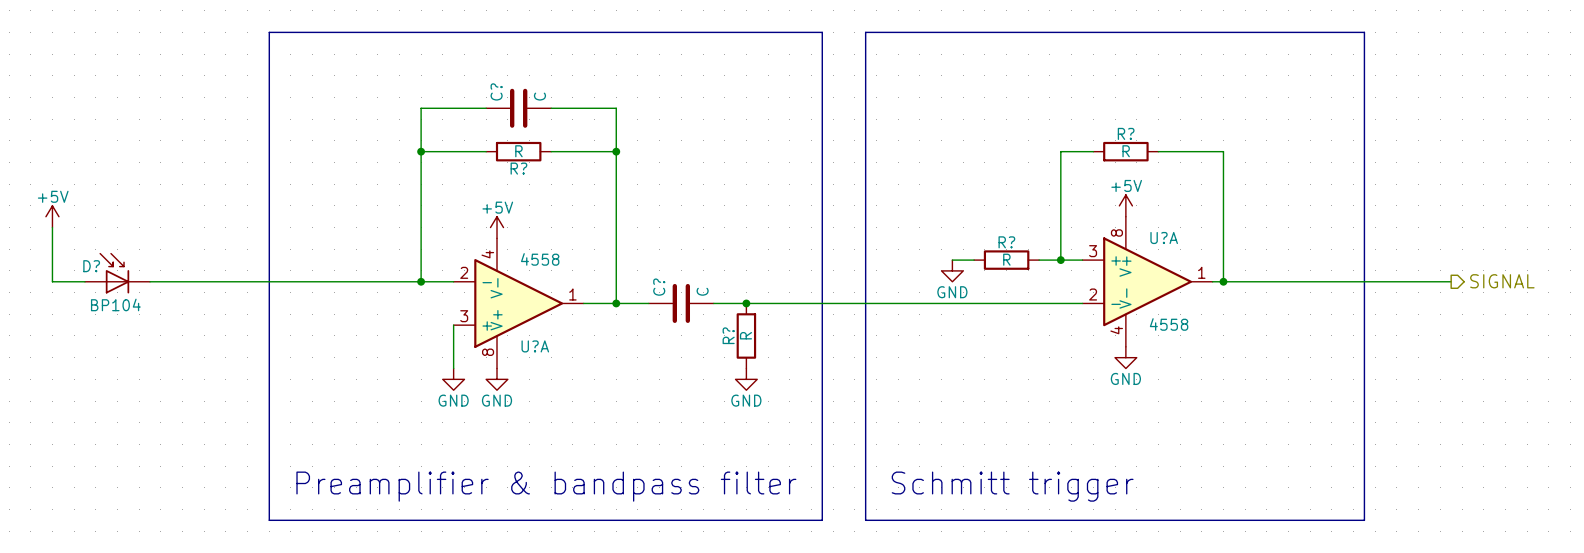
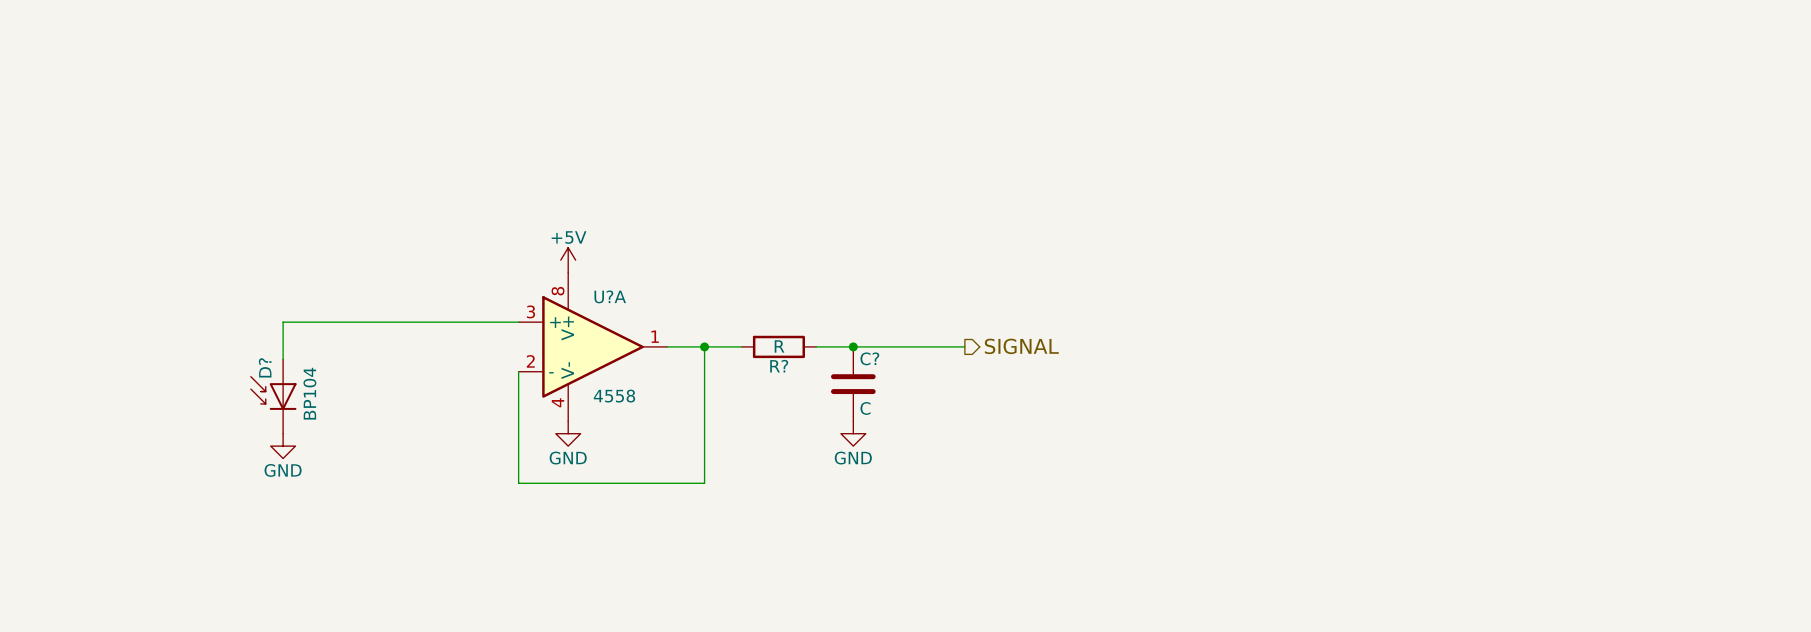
bus: (269, 32) (822, 32) (822, 520) (269, 520) (269, 32) -> none
bus: (865, 32) (865, 520) (1364, 520) (1364, 32) (865, 32) -> none
wire: (486, 108) (421, 108) (421, 281) -> none
C?: C (518, 108) -> none
wire: (551, 108) (616, 108) (616, 303) -> (518, 421) (518, 483) (704, 483) (704, 346)
wire: (421, 151) (486, 151) -> none
junction: (421, 151) -> none
R?: R (518, 151) -> none
wire: (551, 151) (616, 151) -> none
junction: (616, 151) -> none
wire: (1093, 151) (1060, 151) (1060, 260) -> none
R?: R (1125, 151) -> none
wire: (1158, 151) (1223, 151) (1223, 281) -> none
power symbol: +5V (1125, 205) -> none
power symbol: +5V (52, 216) -> none
wire: (52, 227) (52, 281) (84, 281) -> none
wire: (952, 260) (974, 260) -> none
R?: R (1006, 260) -> none
wire: (1039, 260) (1082, 260) -> none
junction: (1060, 260) -> none
power symbol: GND (952, 270) -> none
D?: BP104 (117, 273) -> none
wire: (150, 281) (247, 281) -> (283, 359) (283, 322)
junction: (421, 281) -> none
U?A: 4558 (1147, 281) -> none
wire: (1212, 281) (1451, 281) -> none
junction: (1223, 281) -> none
hierarchical label: SIGNAL (1502, 281) -> none
hierarchical label: none -> SIGNAL (1021, 346)
U?A flip: as is (518, 303) -> up-down (593, 346)
C? rotation: 0° (681, 303) -> 90° clockwise (853, 384)
C? position: (681, 303) -> (853, 384)
wire: (843, 303) (1082, 303) -> none
R? name position: R? (728, 335) -> R? (779, 366)
R? rotation: 0° (746, 335) -> 90° clockwise (778, 346)
R? position: (746, 335) -> (778, 346)
D?: none -> BP104 (273, 396)
power symbol: GND (1125, 357) -> none
power symbol position: GND (453, 379) -> GND (283, 446)
text: Preamplifier & bandpass filter (546, 486) -> none
text: Schmitt trigger (1012, 486) -> none

